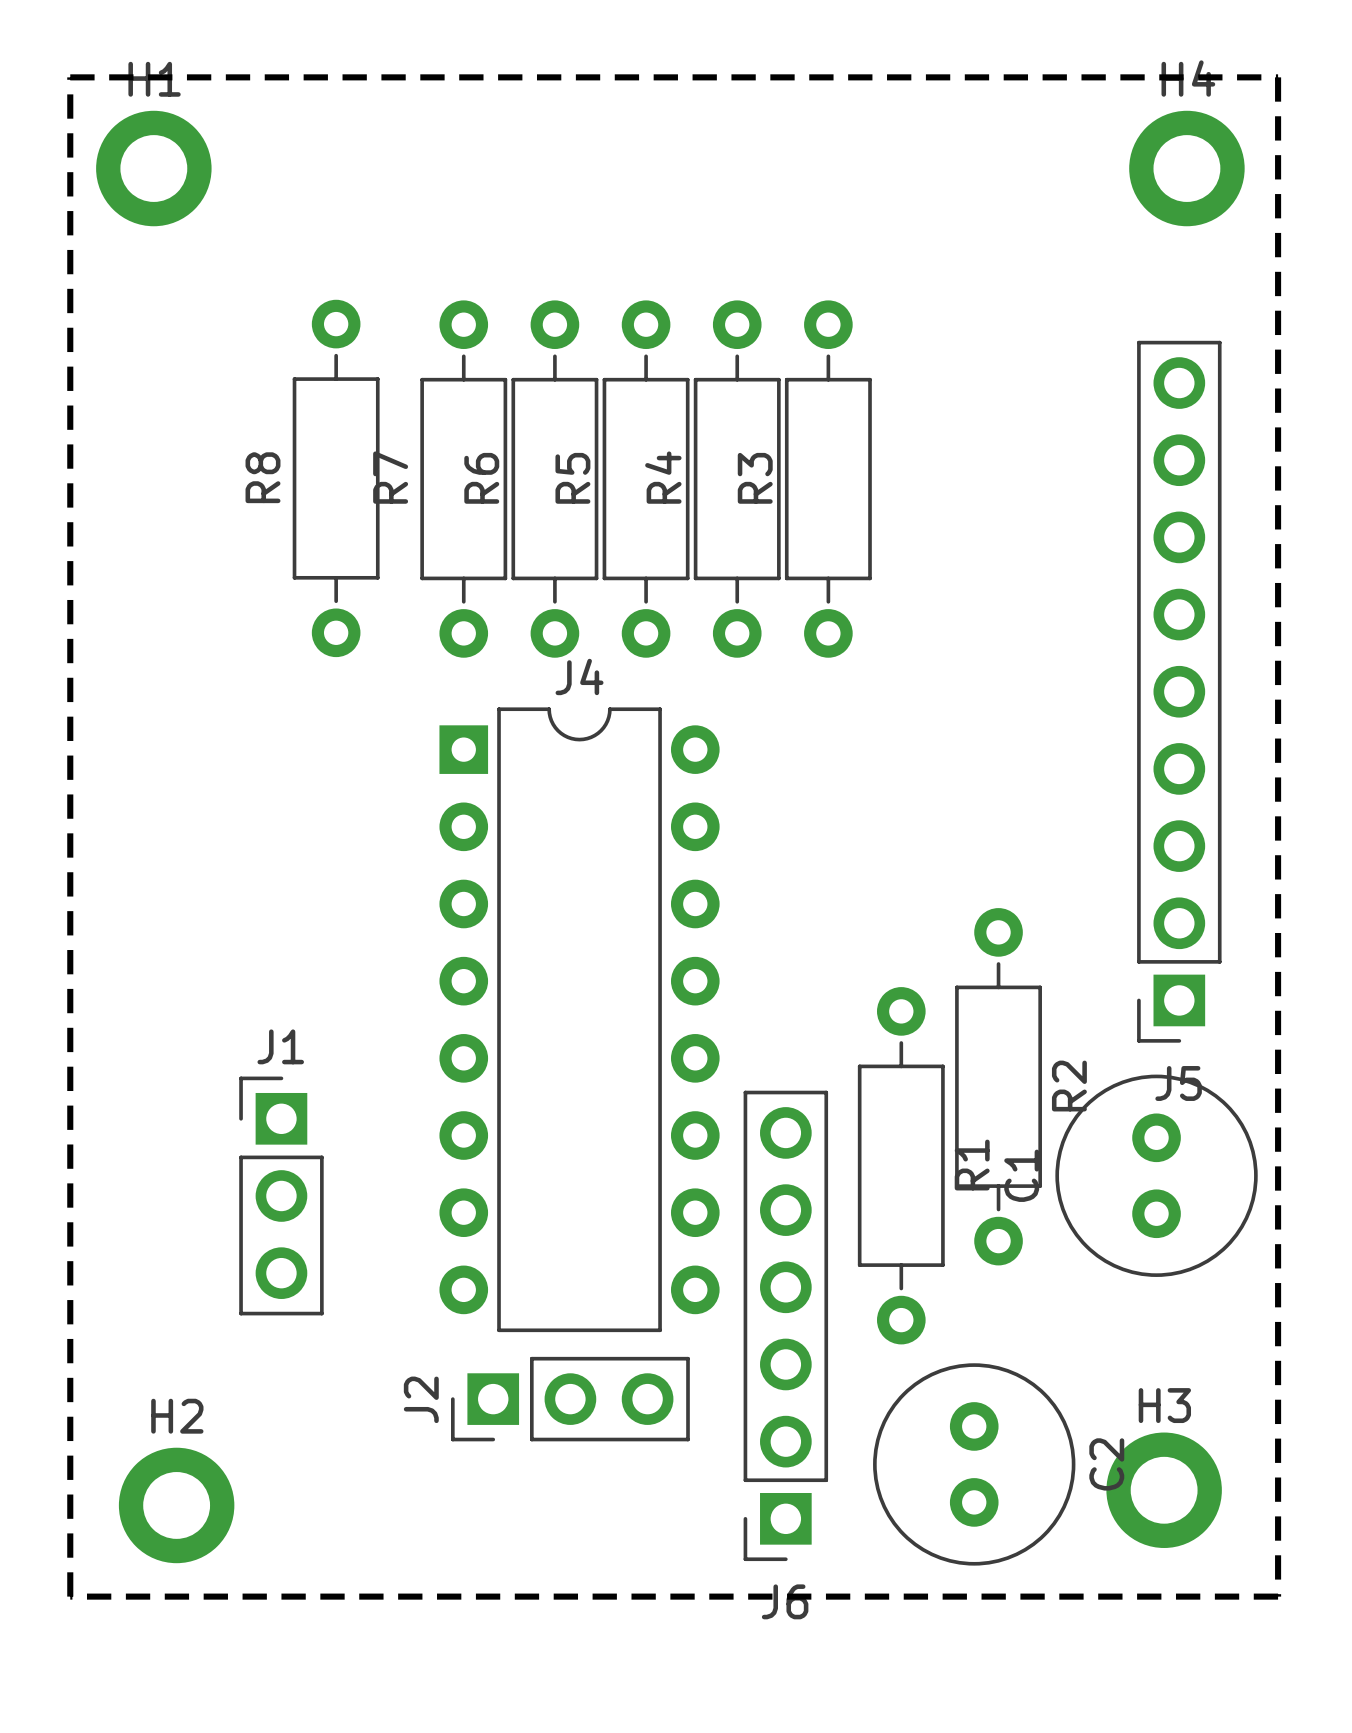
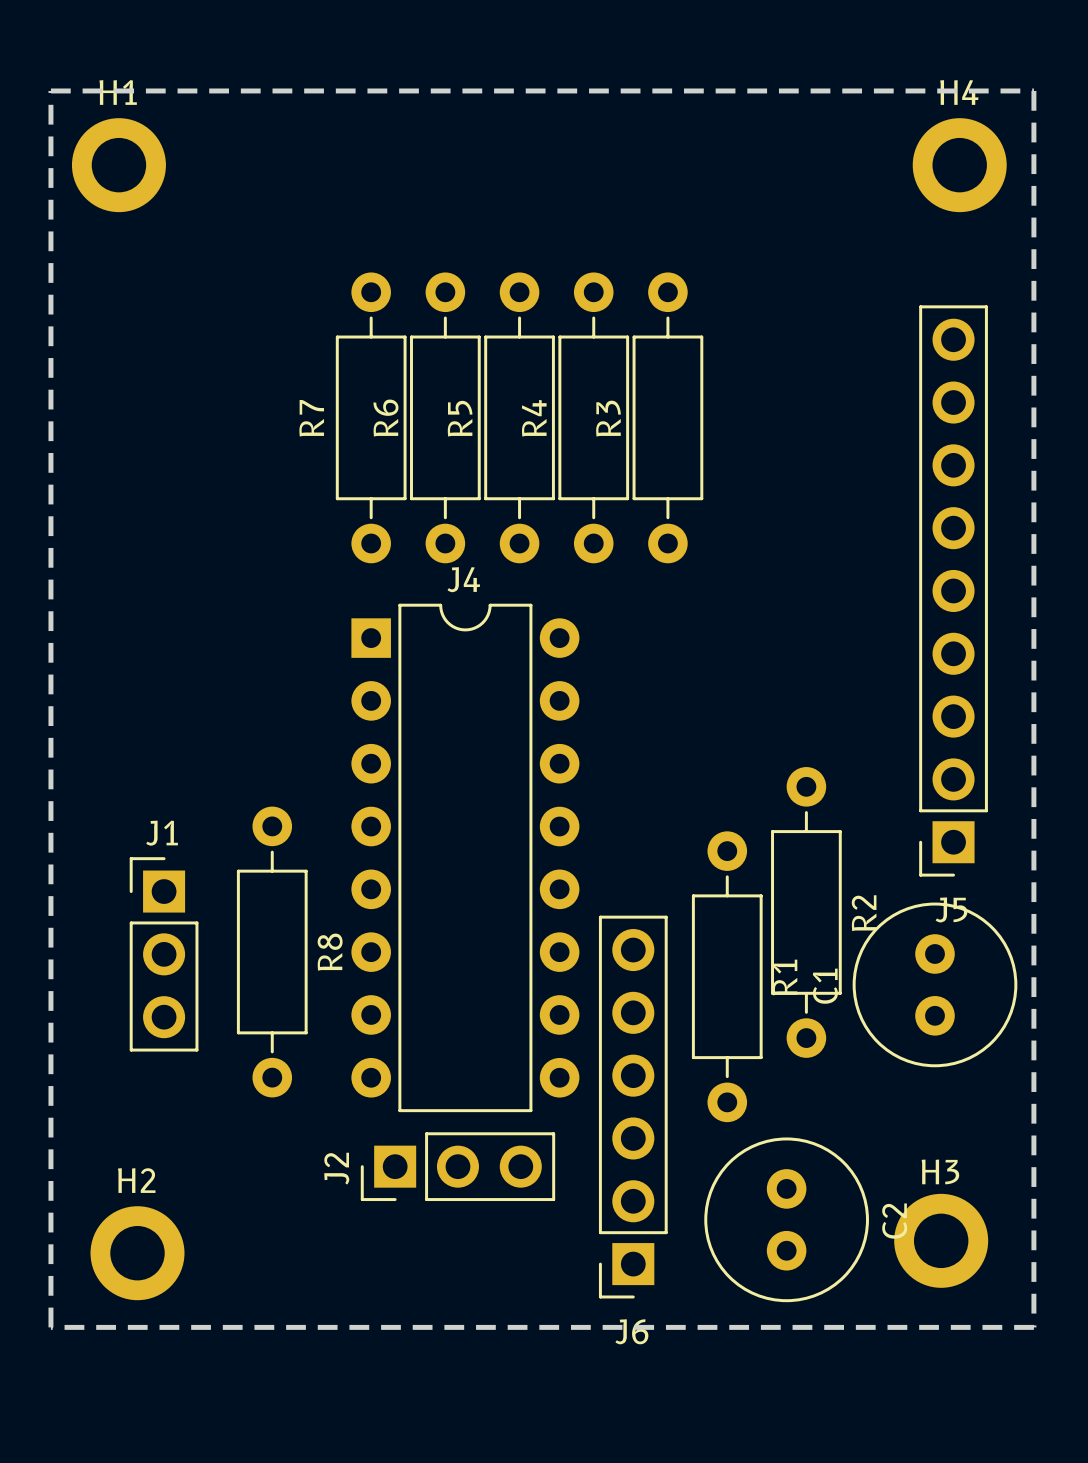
R8 name position: R8 (262, 477) -> R8 (330, 952)
R8 position: (336, 478) -> (272, 952)
J1 position: (281, 1195) -> (164, 954)

